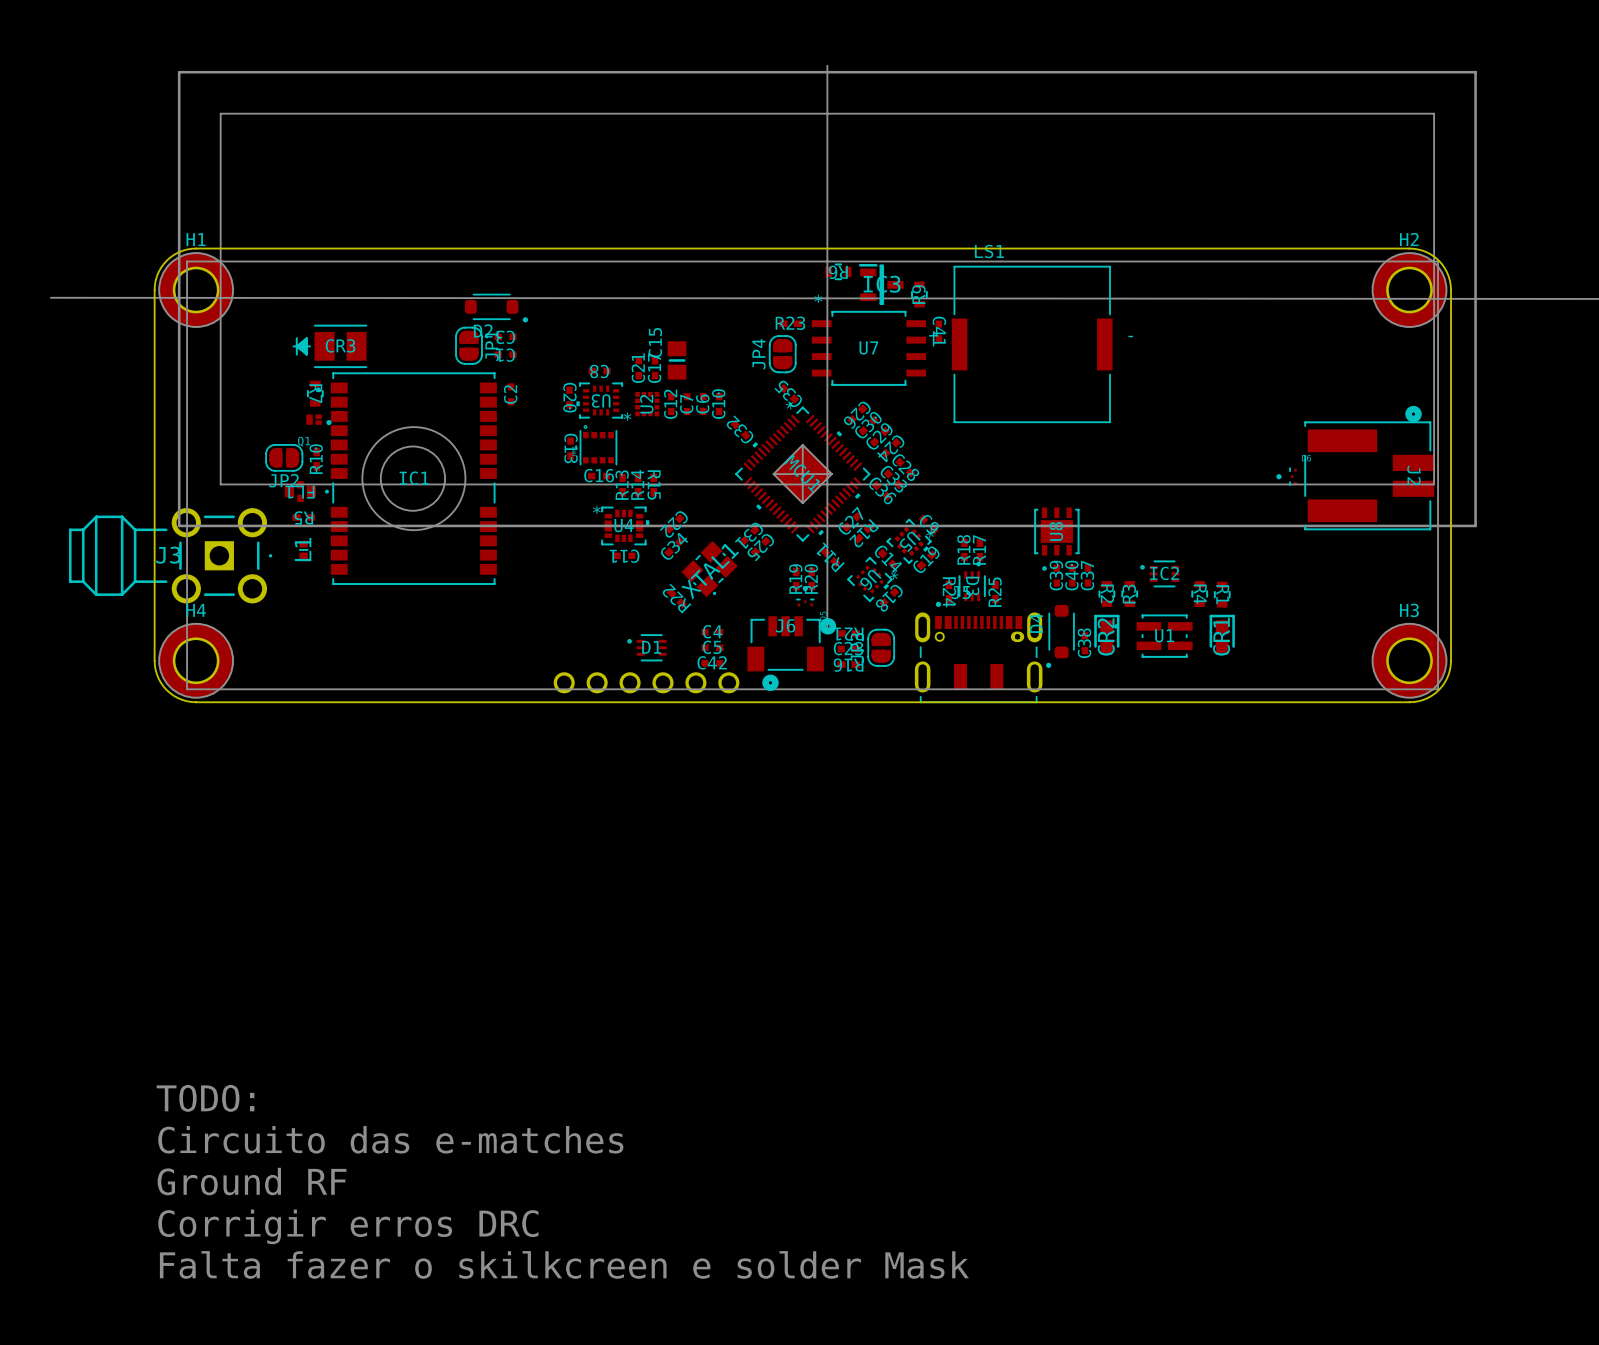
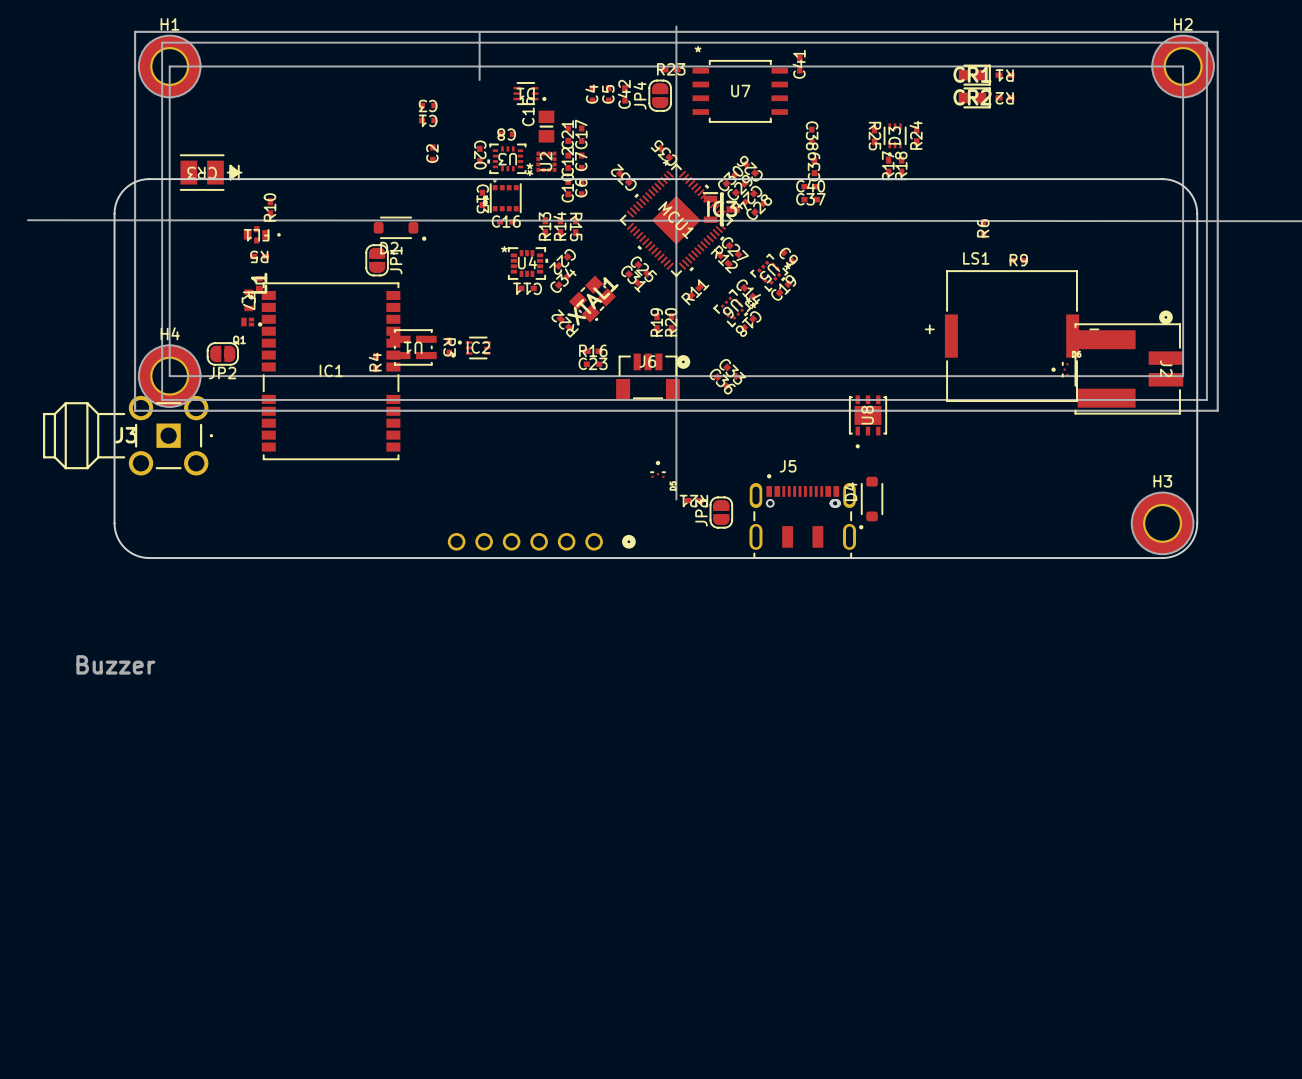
line: none -> (479, 31) (479, 80)
line: (187, 261) (1438, 261) (1438, 689) (187, 689) (187, 261) -> (162, 42) (1206, 42) (1206, 399) (162, 399) (162, 42)
R6 footprint: [825, 263, 852, 281] -> [980, 219, 987, 239]
R9 footprint: [911, 281, 928, 308] -> [1008, 257, 1029, 264]
H1 position: (196, 290) -> (169, 66)
H2 position: (1409, 290) -> (1183, 66)
R23 position: (790, 323) -> (670, 69)
C41 position: (938, 331) -> (799, 64)
C41 name rotation: 0° (939, 331) -> 180° (799, 64)
C3 position: (505, 336) -> (428, 105)
LS1 position: (1032, 344) -> (1012, 336)
CR3 rotation: 0° (329, 346) -> 180° (211, 172)
CR3 position: (329, 346) -> (211, 172)
U7 position: (868, 348) -> (740, 91)
C1 position: (505, 354) -> (428, 120)
JP4 position: (782, 354) -> (660, 95)
C15 position: (677, 360) -> (546, 126)
C21 position: (638, 368) -> (568, 134)
C17 position: (655, 368) -> (581, 134)
C8 position: (599, 371) -> (506, 134)
C35 position: (789, 393) -> (665, 153)
C2 position: (511, 394) -> (432, 153)
C20 position: (569, 397) -> (479, 154)
U3 position: (599, 400) -> (506, 158)
U2 position: (647, 404) -> (546, 161)
C12 position: (671, 404) -> (568, 161)
C7 position: (687, 404) -> (581, 161)
C6 position: (703, 404) -> (581, 188)
C10 position: (719, 404) -> (568, 188)
C26 rotation: 0° (857, 414) -> 90° clockwise (750, 168)
C26 position: (857, 414) -> (750, 168)
C30 position: (868, 425) -> (730, 179)
drawing: [361, 426, 467, 531] -> none
C32 position: (740, 429) -> (624, 178)
C29 position: (879, 436) -> (740, 188)
line: (802, 444) (773, 474) -> none
line: (802, 444) (831, 474) -> none
line: (802, 444) (802, 503) -> none
part position: (598, 445) -> (505, 196)
C13 position: (570, 448) -> (482, 198)
C24 position: (891, 448) -> (749, 198)
R10 position: (316, 459) -> (270, 207)
C28 rotation: 0° (905, 467) -> 90° clockwise (759, 207)
C28 position: (905, 467) -> (759, 207)
line: (773, 474) (831, 474) -> none
line: (773, 474) (802, 503) -> none
MCU1 position: (802, 474) -> (676, 220)
line: (831, 474) (802, 503) -> none
C16 position: (599, 476) -> (506, 221)
R13 position: (622, 485) -> (545, 226)
R14 position: (638, 485) -> (560, 226)
R15 position: (653, 485) -> (575, 226)
FL1 position: (306, 491) -> (262, 234)
R5 position: (303, 517) -> (259, 256)
C27 rotation: 0° (852, 521) -> 90° clockwise (734, 250)
C27 position: (852, 521) -> (734, 250)
C22 position: (674, 523) -> (563, 261)
C9 position: (928, 524) -> (788, 256)
U4 position: (625, 525) -> (528, 263)
R12 rotation: 0° (863, 533) -> 90° clockwise (724, 259)
R12 position: (863, 533) -> (724, 259)
C31 rotation: 0° (749, 535) -> 90° clockwise (633, 278)
C31 position: (749, 535) -> (633, 278)
U5 position: (909, 541) -> (769, 272)
C25 rotation: 0° (760, 546) -> 90° clockwise (642, 269)
C25 position: (760, 546) -> (642, 269)
C34 position: (674, 547) -> (563, 280)
L1 position: (303, 549) -> (259, 283)
R18 position: (964, 549) -> (901, 166)
R17 position: (979, 549) -> (888, 166)
C11 position: (624, 555) -> (527, 288)
R11 rotation: 0° (830, 557) -> 90° clockwise (695, 291)
R11 position: (830, 557) -> (695, 291)
C14 position: (887, 559) -> (748, 292)
C19 position: (926, 560) -> (783, 288)
XTAL1 position: (709, 569) -> (592, 299)
IC2 position: (1159, 573) -> (474, 347)
C39 position: (1056, 575) -> (814, 166)
C40 rotation: 0° (1072, 575) -> 90° clockwise (810, 186)
C40 position: (1072, 575) -> (810, 186)
C37 rotation: 0° (1087, 575) -> 90° clockwise (810, 199)
C37 position: (1087, 575) -> (810, 199)
R19 position: (796, 579) -> (657, 322)
R20 position: (811, 579) -> (671, 322)
U6 position: (869, 579) -> (732, 308)
D3 rotation: 0° (972, 581) -> 180° (895, 139)
D3 position: (972, 581) -> (895, 139)
R2 footprint: [1098, 581, 1116, 607] -> [995, 95, 1015, 101]
R3 footprint: [1121, 581, 1139, 607] -> [446, 337, 452, 357]
R4 footprint: [1191, 581, 1209, 607] -> [373, 353, 379, 373]
R1 footprint: [1213, 581, 1231, 608] -> [995, 72, 1015, 78]
R24 position: (948, 592) -> (916, 135)
R24 name rotation: 0° (949, 592) -> 180° (916, 135)
R25 position: (995, 592) -> (874, 135)
R25 name rotation: 0° (995, 592) -> 180° (874, 136)
C18 position: (889, 597) -> (748, 323)
R22 position: (676, 598) -> (564, 323)
C4 rotation: 0° (712, 632) -> 90° clockwise (592, 94)
C4 position: (712, 632) -> (592, 94)
CR2 rotation: 0° (1106, 634) -> 90° clockwise (974, 97)
CR2 position: (1106, 634) -> (974, 97)
CR1 rotation: 0° (1222, 634) -> 90° clockwise (974, 75)
CR1 position: (1222, 634) -> (974, 75)
U1 rotation: 0° (1153, 636) -> 180° (422, 347)
U1 position: (1153, 636) -> (422, 347)
J6 position: (791, 643) -> (653, 376)
C38 position: (1084, 643) -> (811, 135)
C38 name rotation: 0° (1084, 643) -> 180° (812, 135)
D1 rotation: 0° (646, 647) -> 180° (529, 93)
D1 position: (646, 647) -> (529, 93)
C5 rotation: 0° (712, 647) -> 90° clockwise (608, 94)
C5 position: (712, 647) -> (608, 94)
C23 position: (848, 649) -> (593, 364)
H4 position: (196, 660) -> (169, 376)
C42 rotation: 0° (712, 663) -> 90° clockwise (624, 94)
C42 position: (712, 663) -> (624, 94)
R16 position: (848, 664) -> (593, 351)
R16 name rotation: 0° (848, 665) -> 180° (593, 350)
text: none -> Buzzer (115, 664)
text: TODO: (205, 1098) -> none
text: Circuito das e-matches (390, 1139) -> none
text: Ground RF (252, 1181) -> none
text: Corrigir erros DRC (348, 1226) -> none
text: Falta fazer o skilkcreen e solder Mask (564, 1264) -> none

